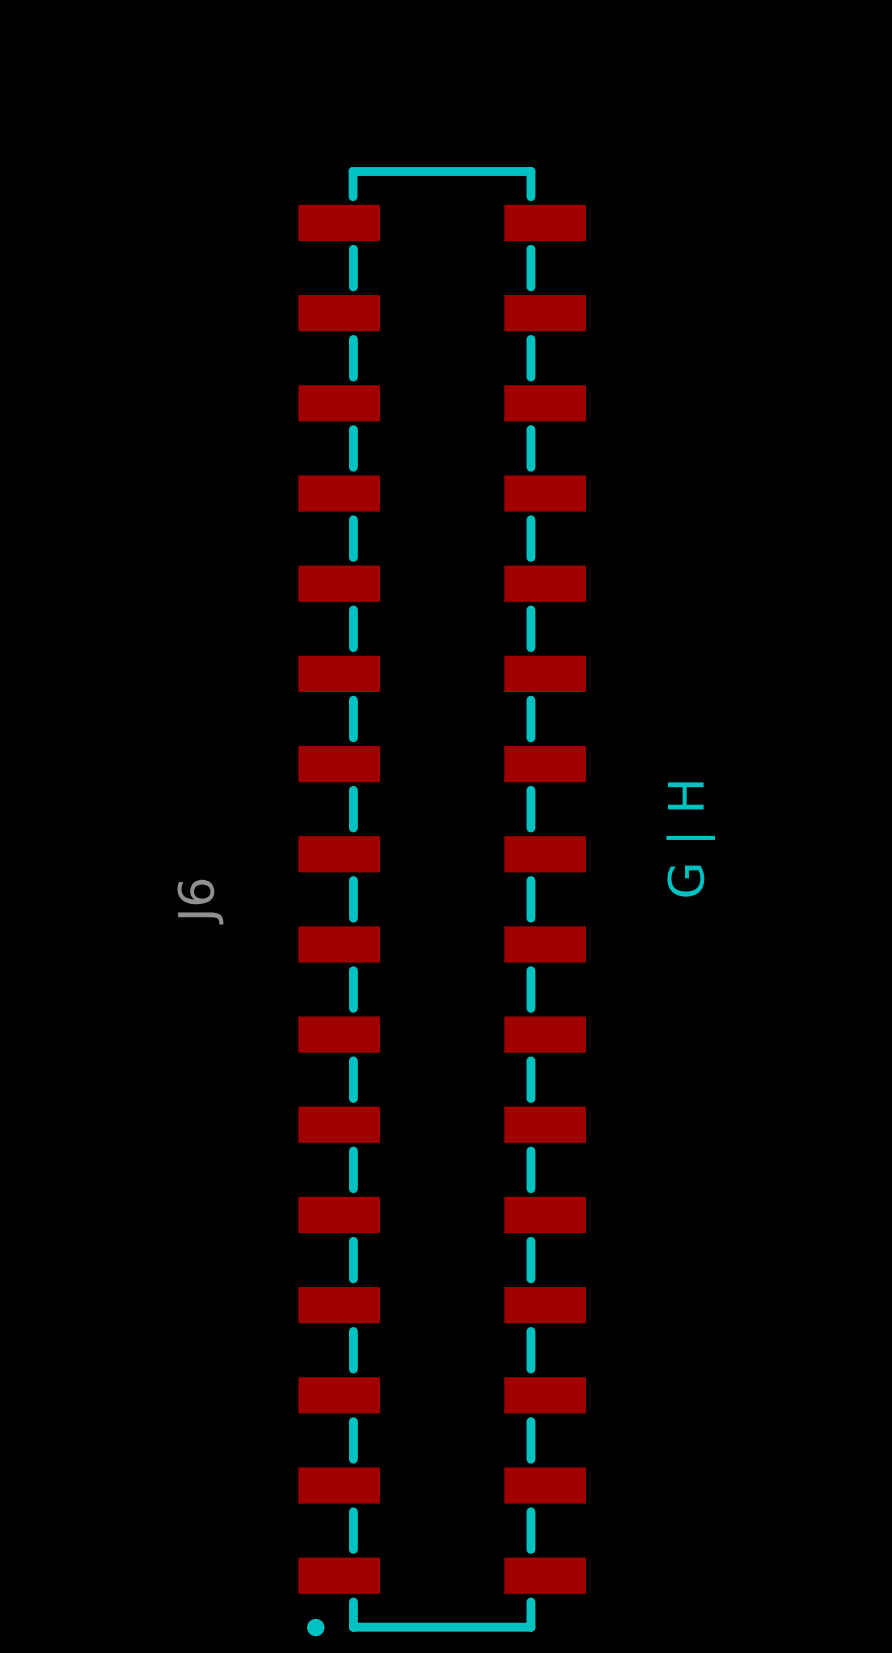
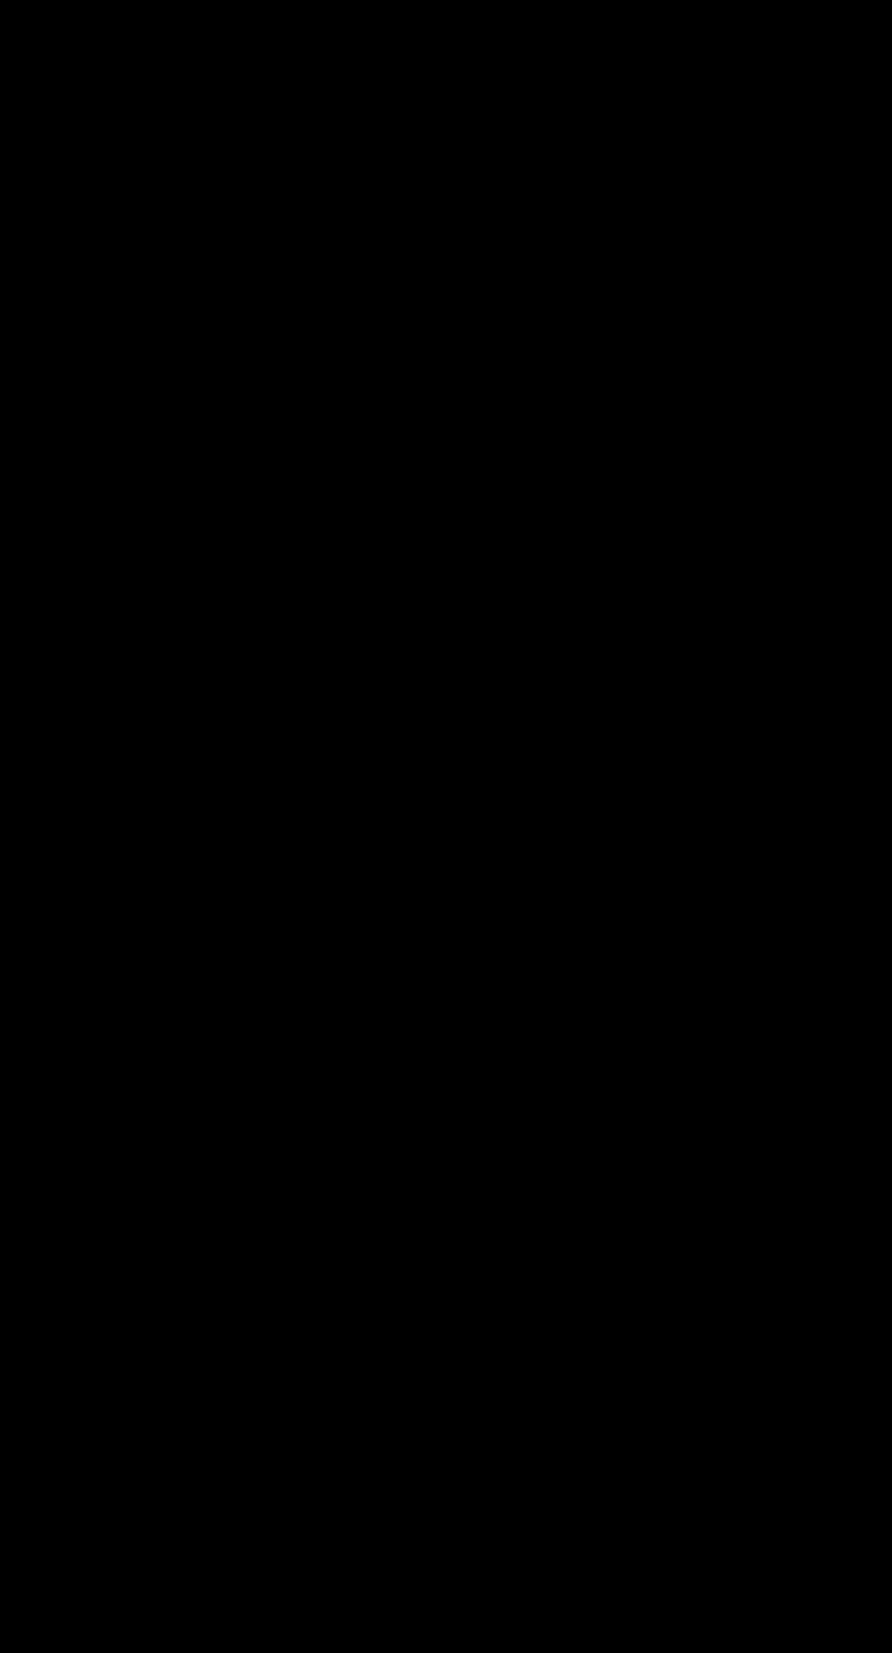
J6: (442, 901) -> none

